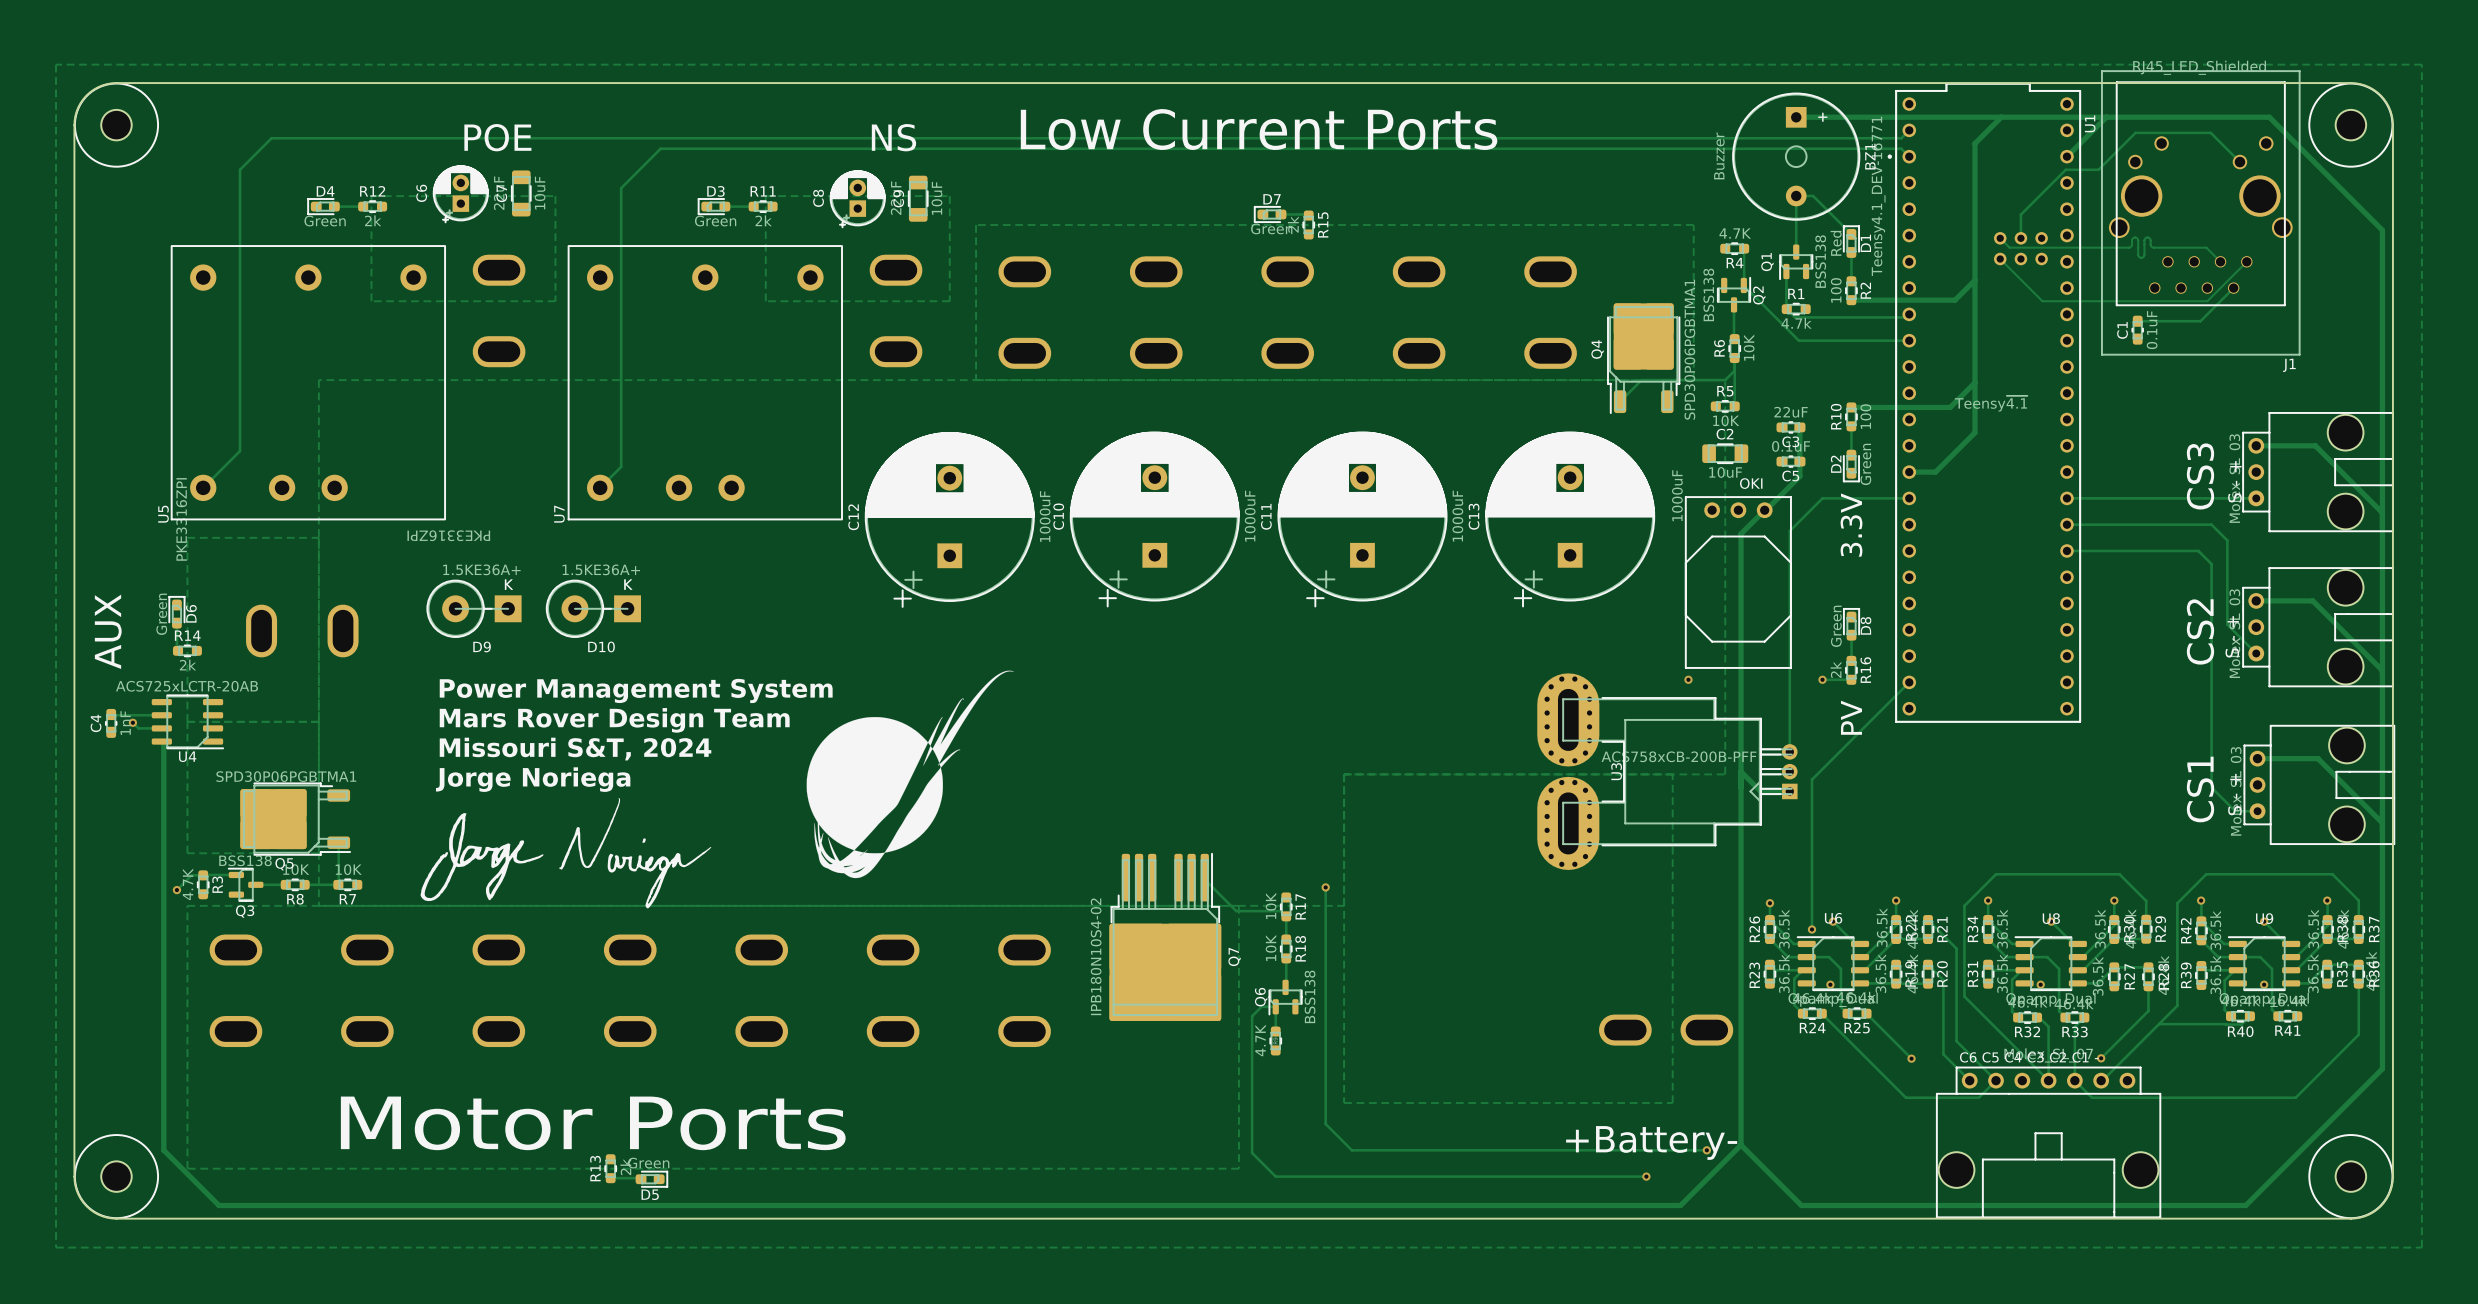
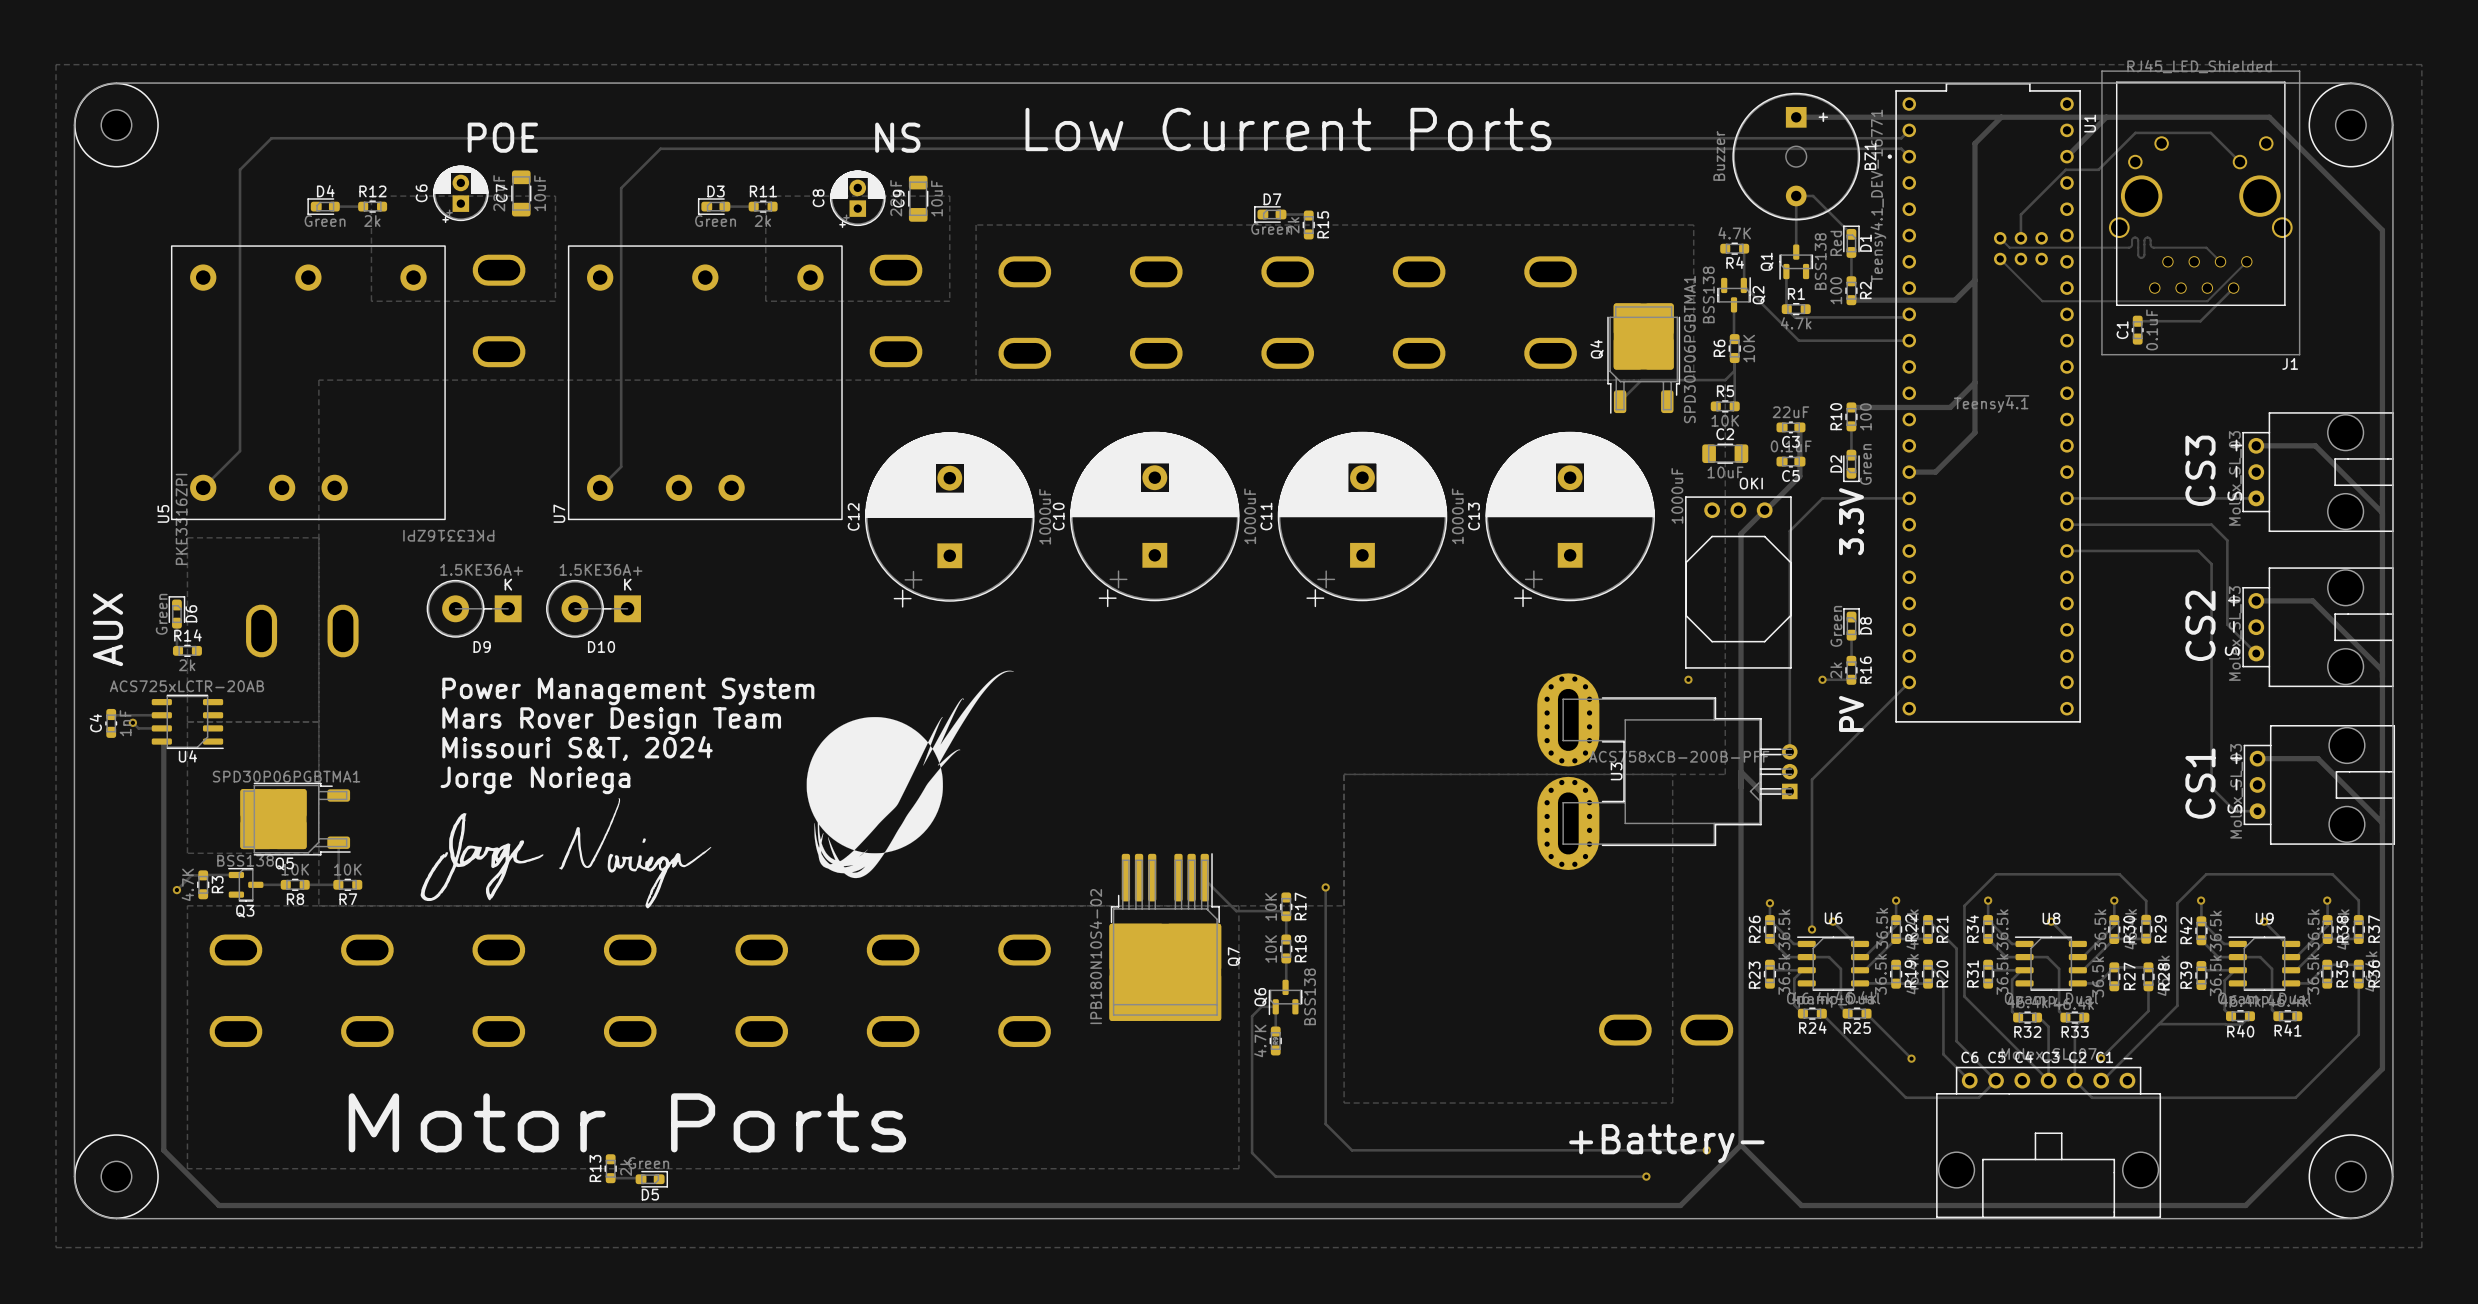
via: (1830, 984) -> none
via: (2040, 984) -> none
via: (2264, 984) -> none

